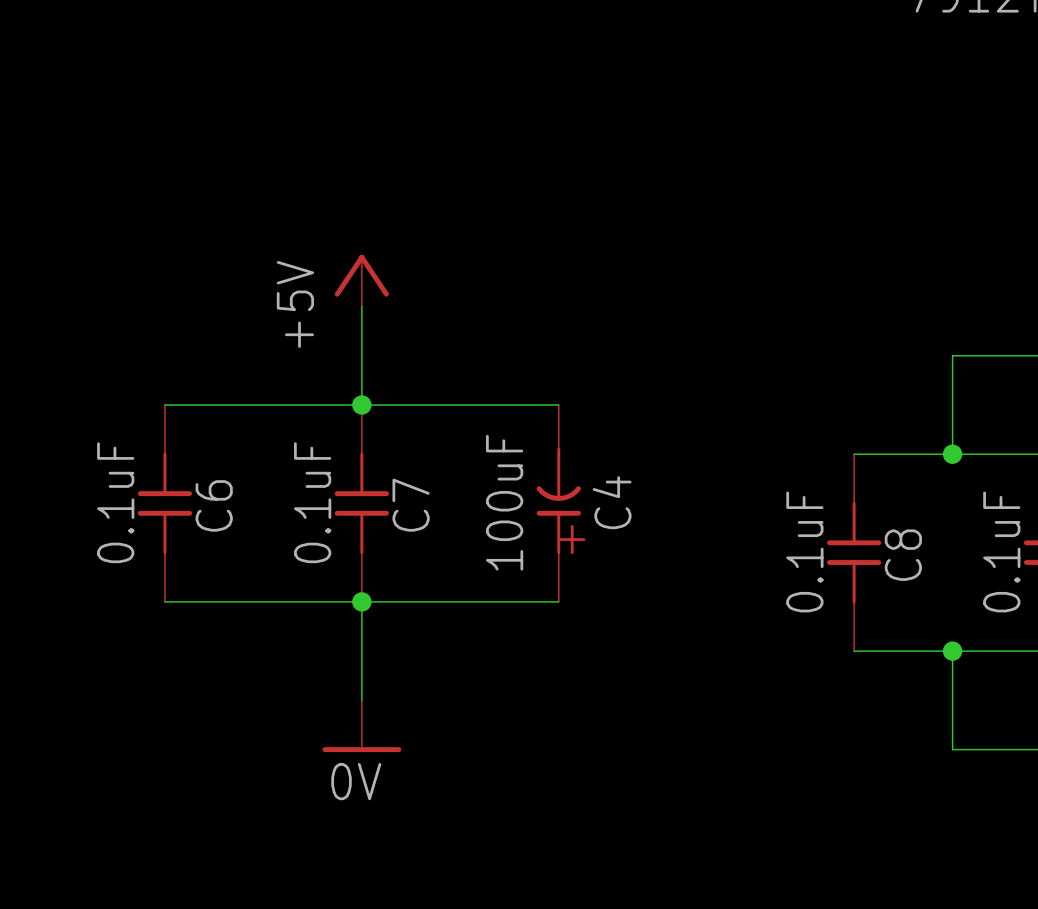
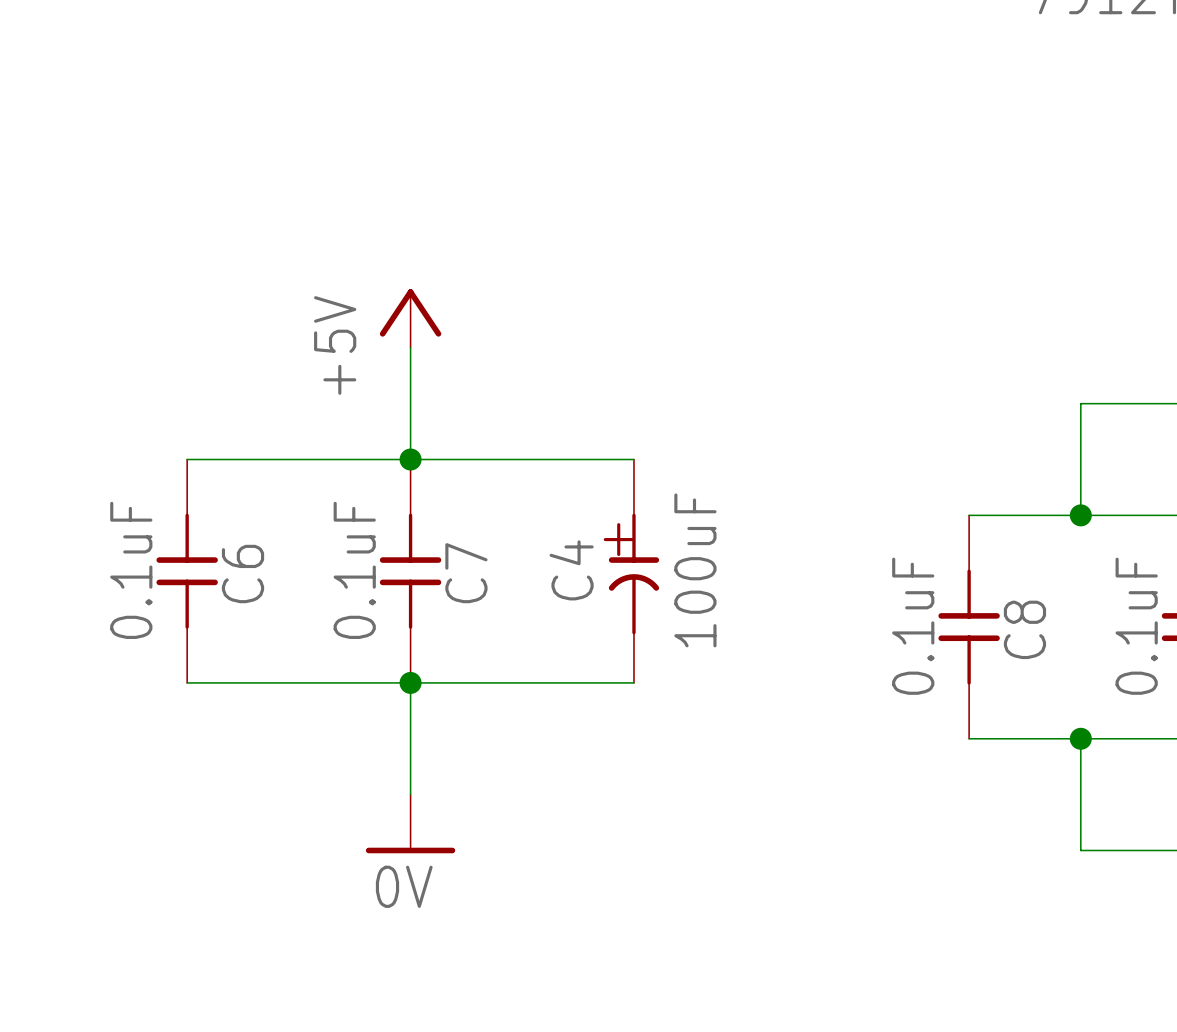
C4 symbol: [536, 405, 581, 602] -> [608, 459, 660, 683]
C4 value position: 100uF (504, 502) -> 100uF (695, 570)
C4 name position: C4 (612, 502) -> C4 (571, 570)

